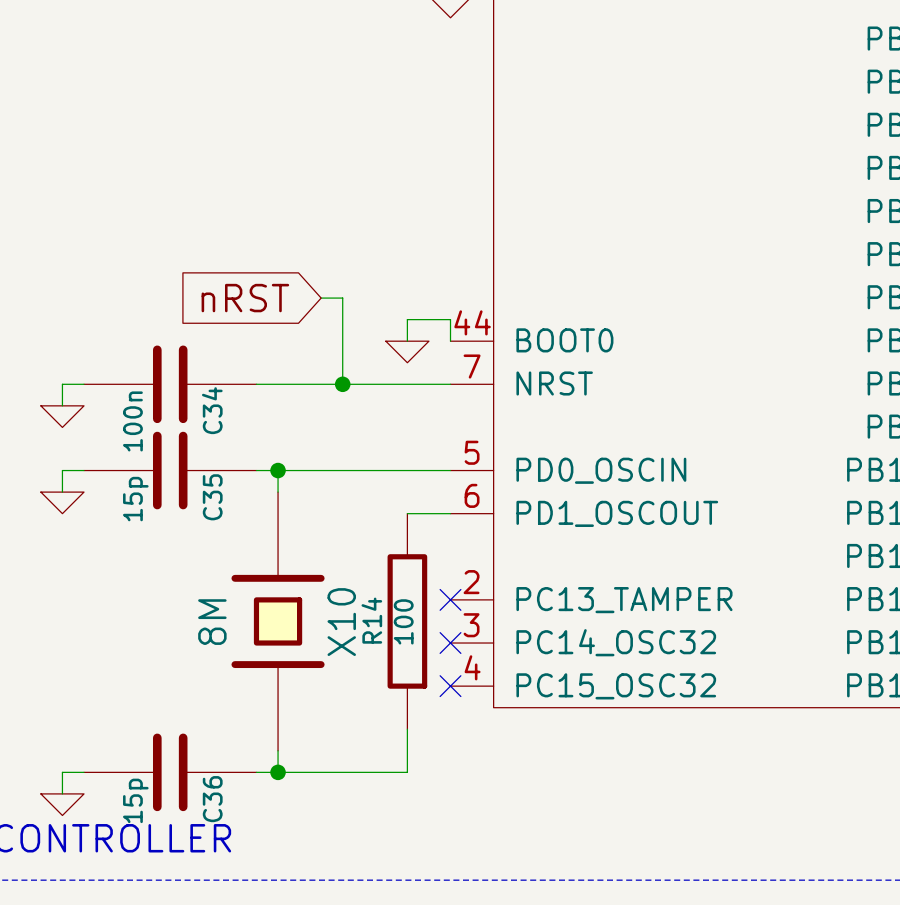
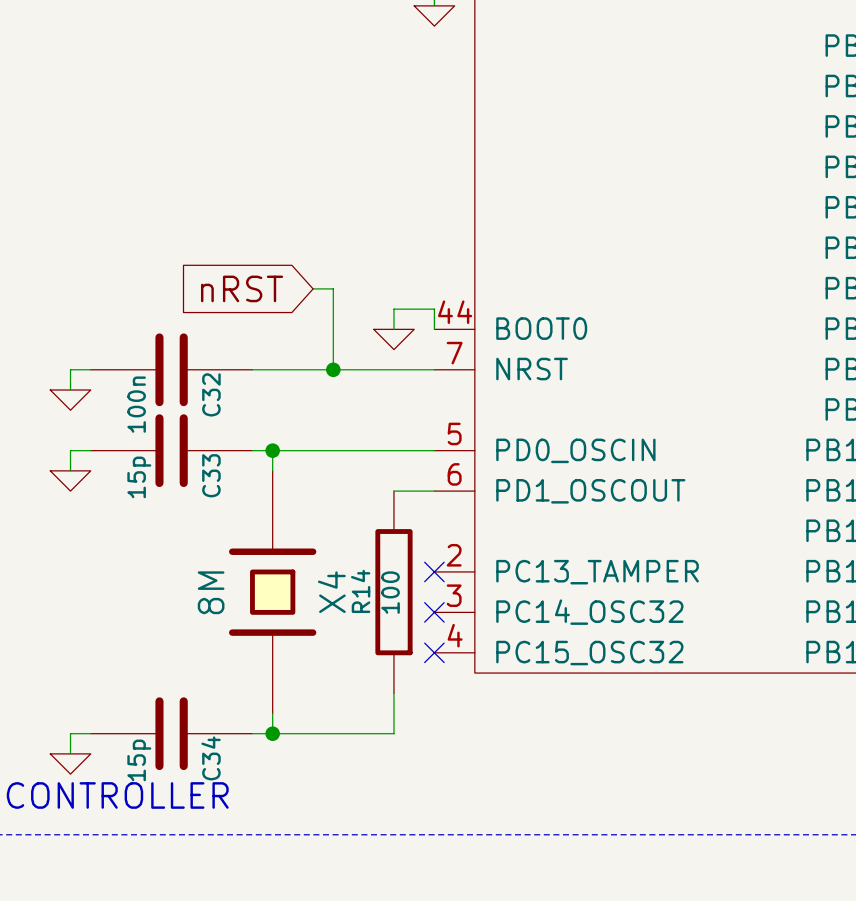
C34 name: C34 (212, 410) -> C32 (211, 394)
C35 name: C35 (212, 497) -> C33 (211, 475)
X10 name: X10 (341, 622) -> X4 (331, 592)
C36 name: C36 (212, 799) -> C34 (211, 758)

